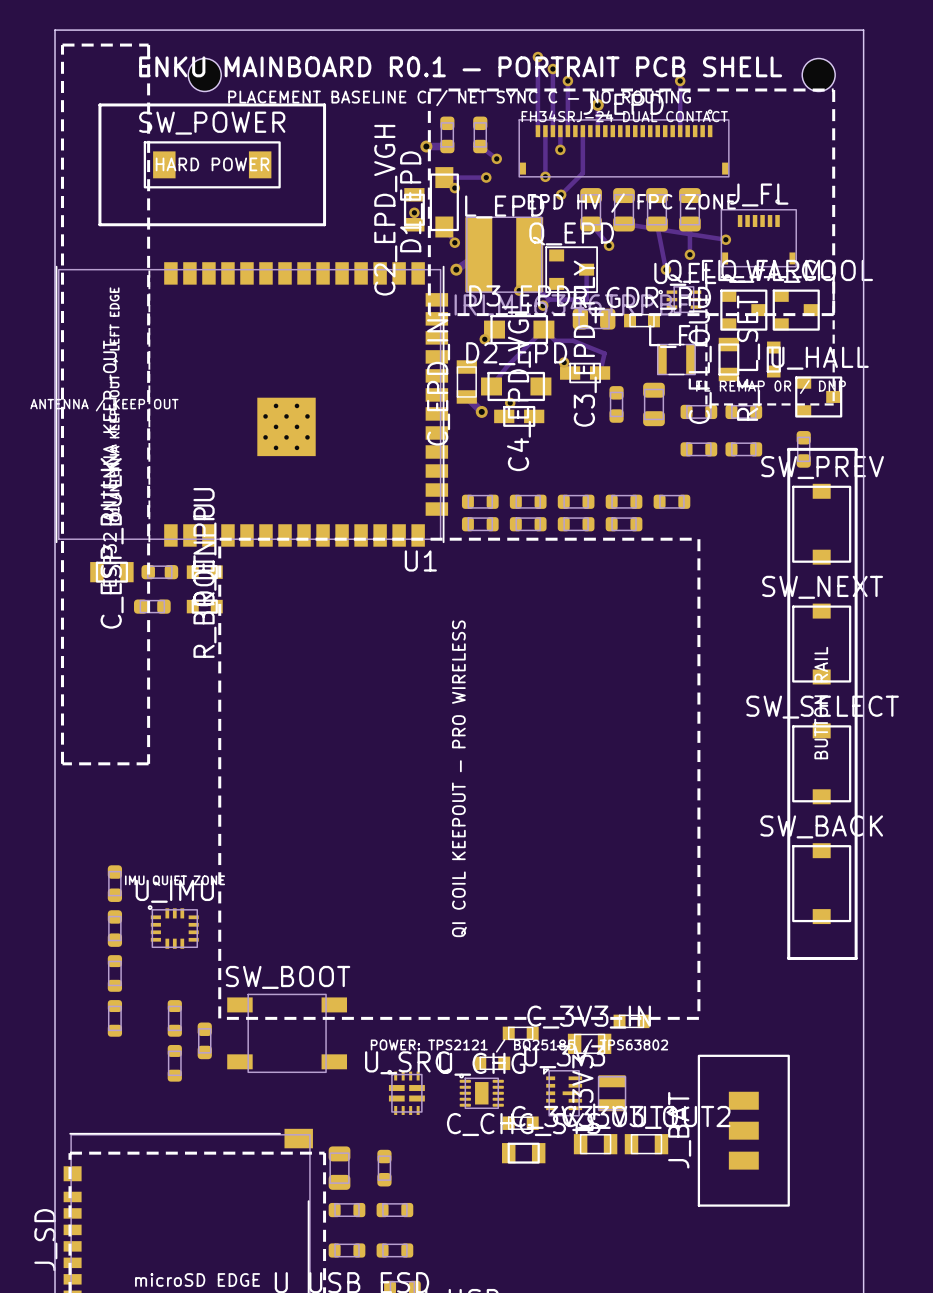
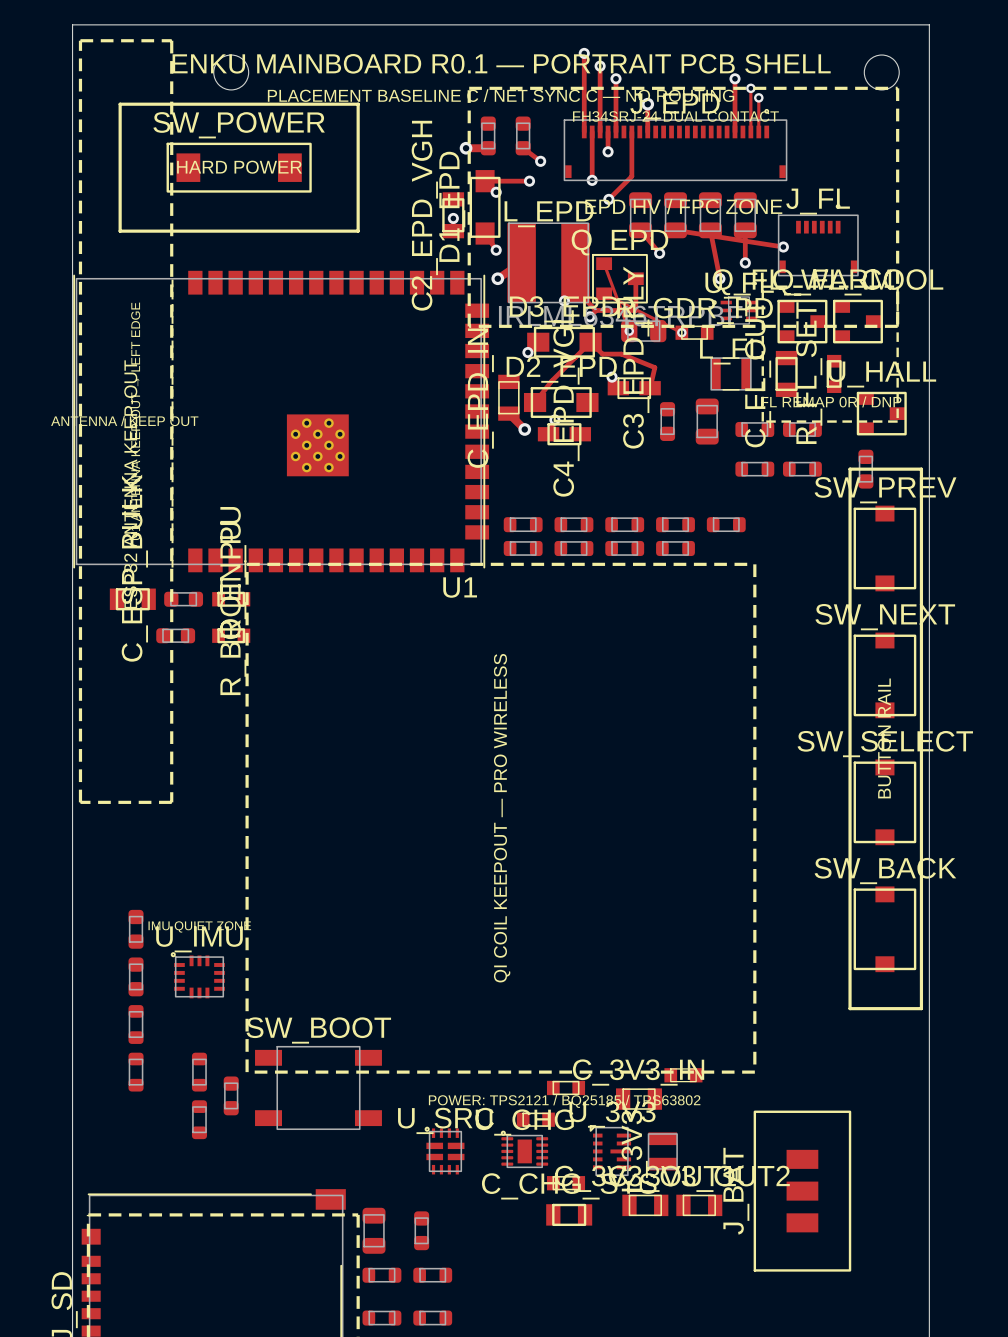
track: none -> (750, 88) (750, 131)
via: none -> (750, 88)
track: none -> (758, 97) (758, 131)
via: none -> (758, 97)
track: none -> (604, 263) (629, 331)
track: none -> (604, 293) (681, 332)
via: none -> (629, 331)
via: none -> (681, 332)

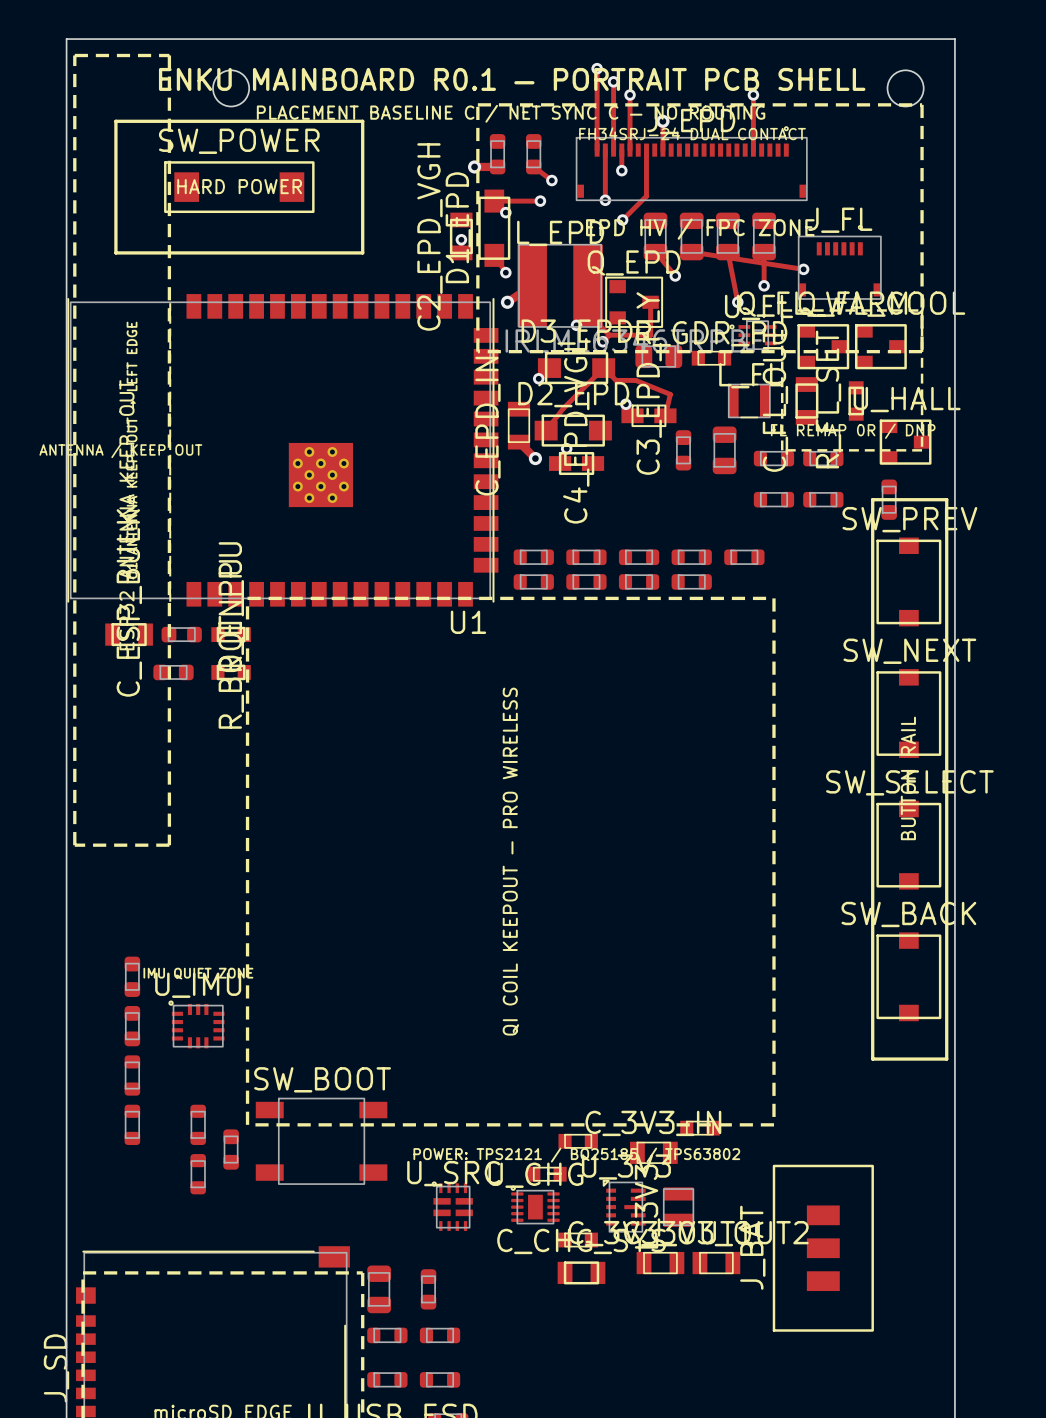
track: (750, 88) (750, 131) -> none
via: (750, 88) -> none
track: (758, 97) (758, 131) -> none
via: (758, 97) -> none
track: (604, 263) (629, 331) -> none
track: (604, 293) (681, 332) -> none
via: (629, 331) -> none
via: (681, 332) -> none

